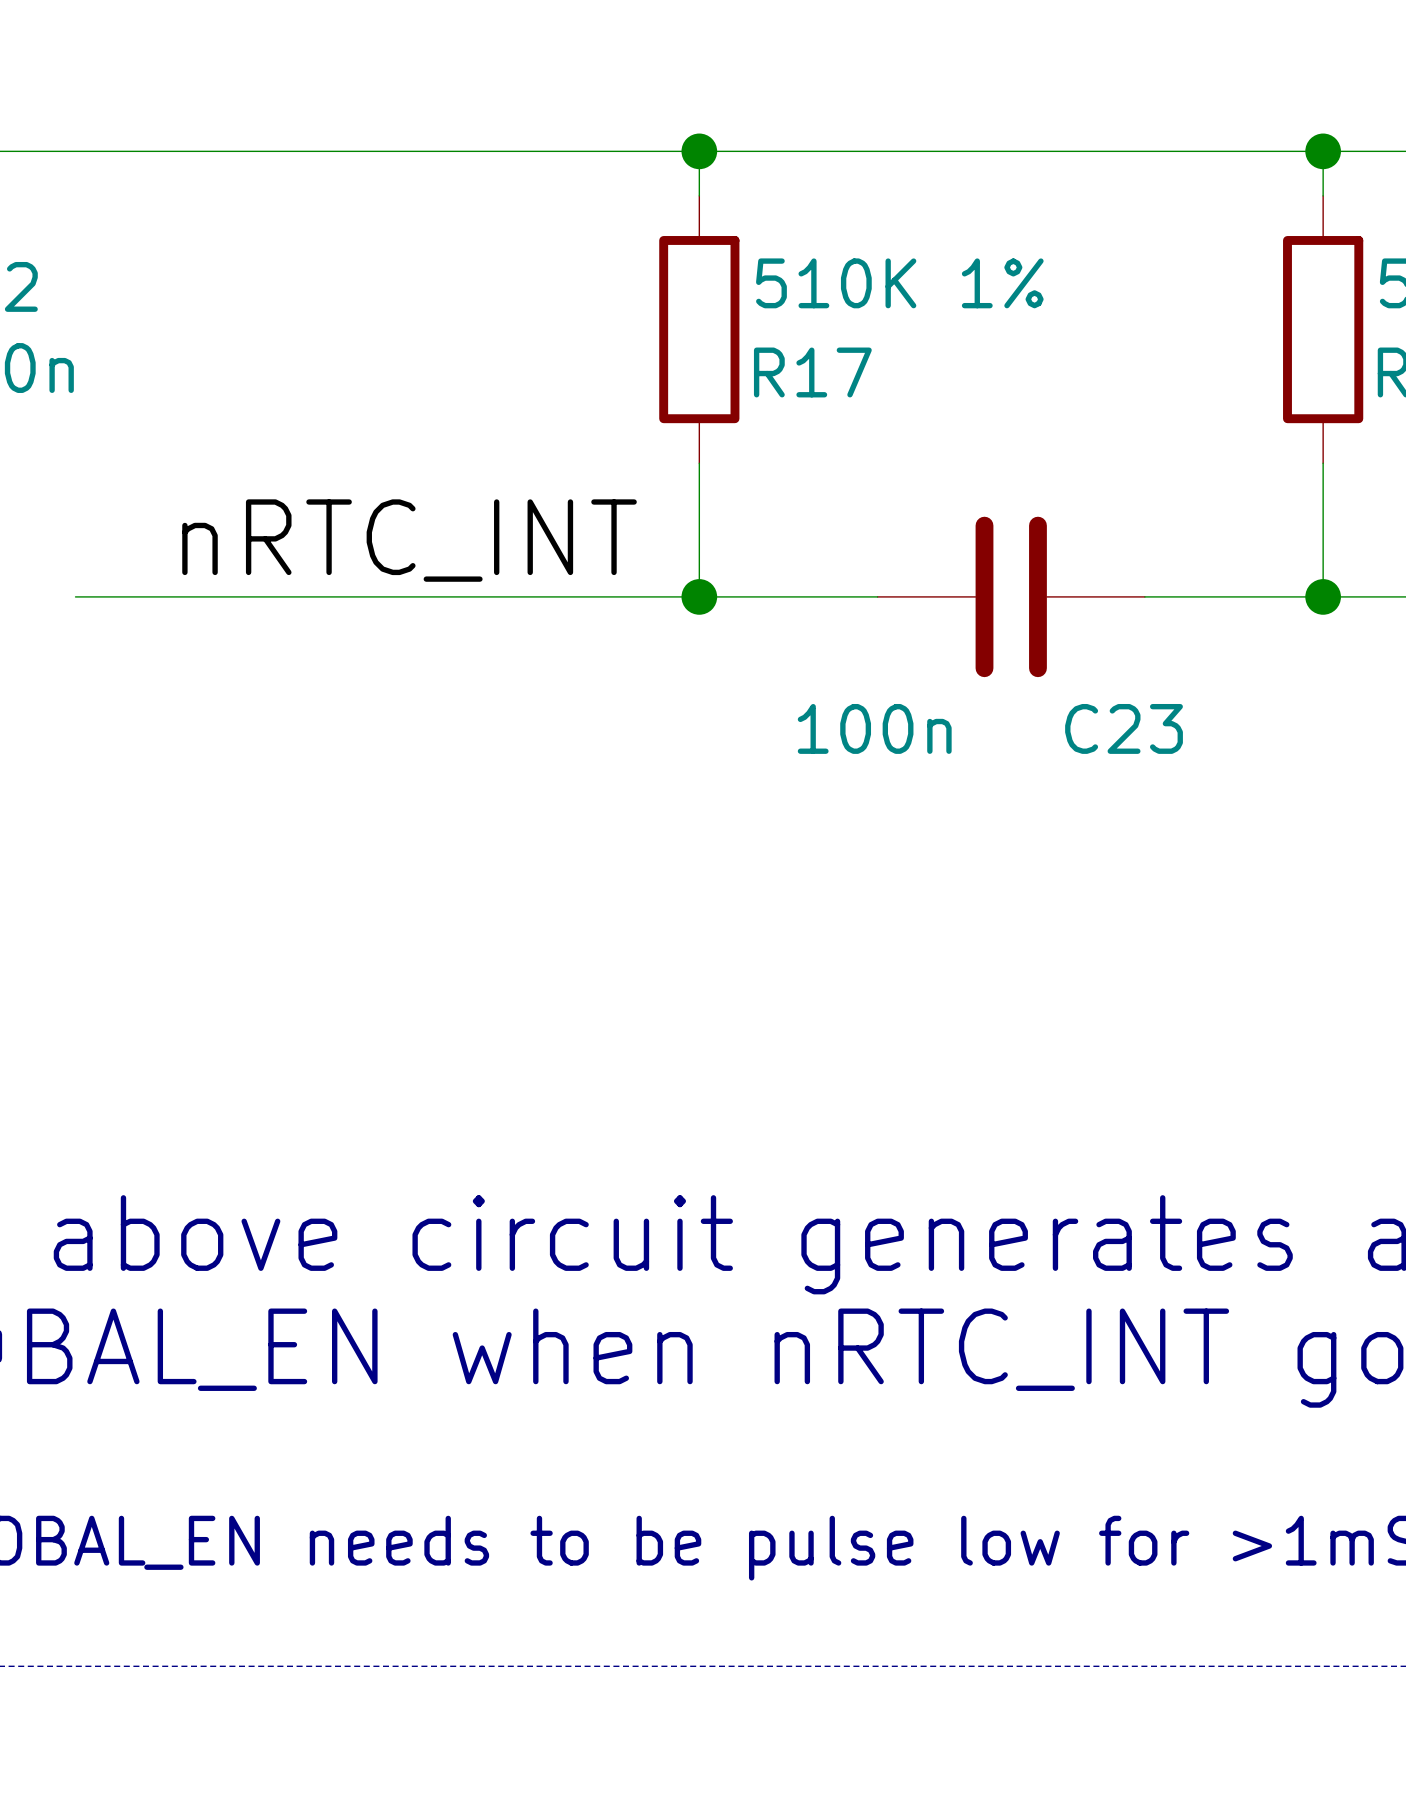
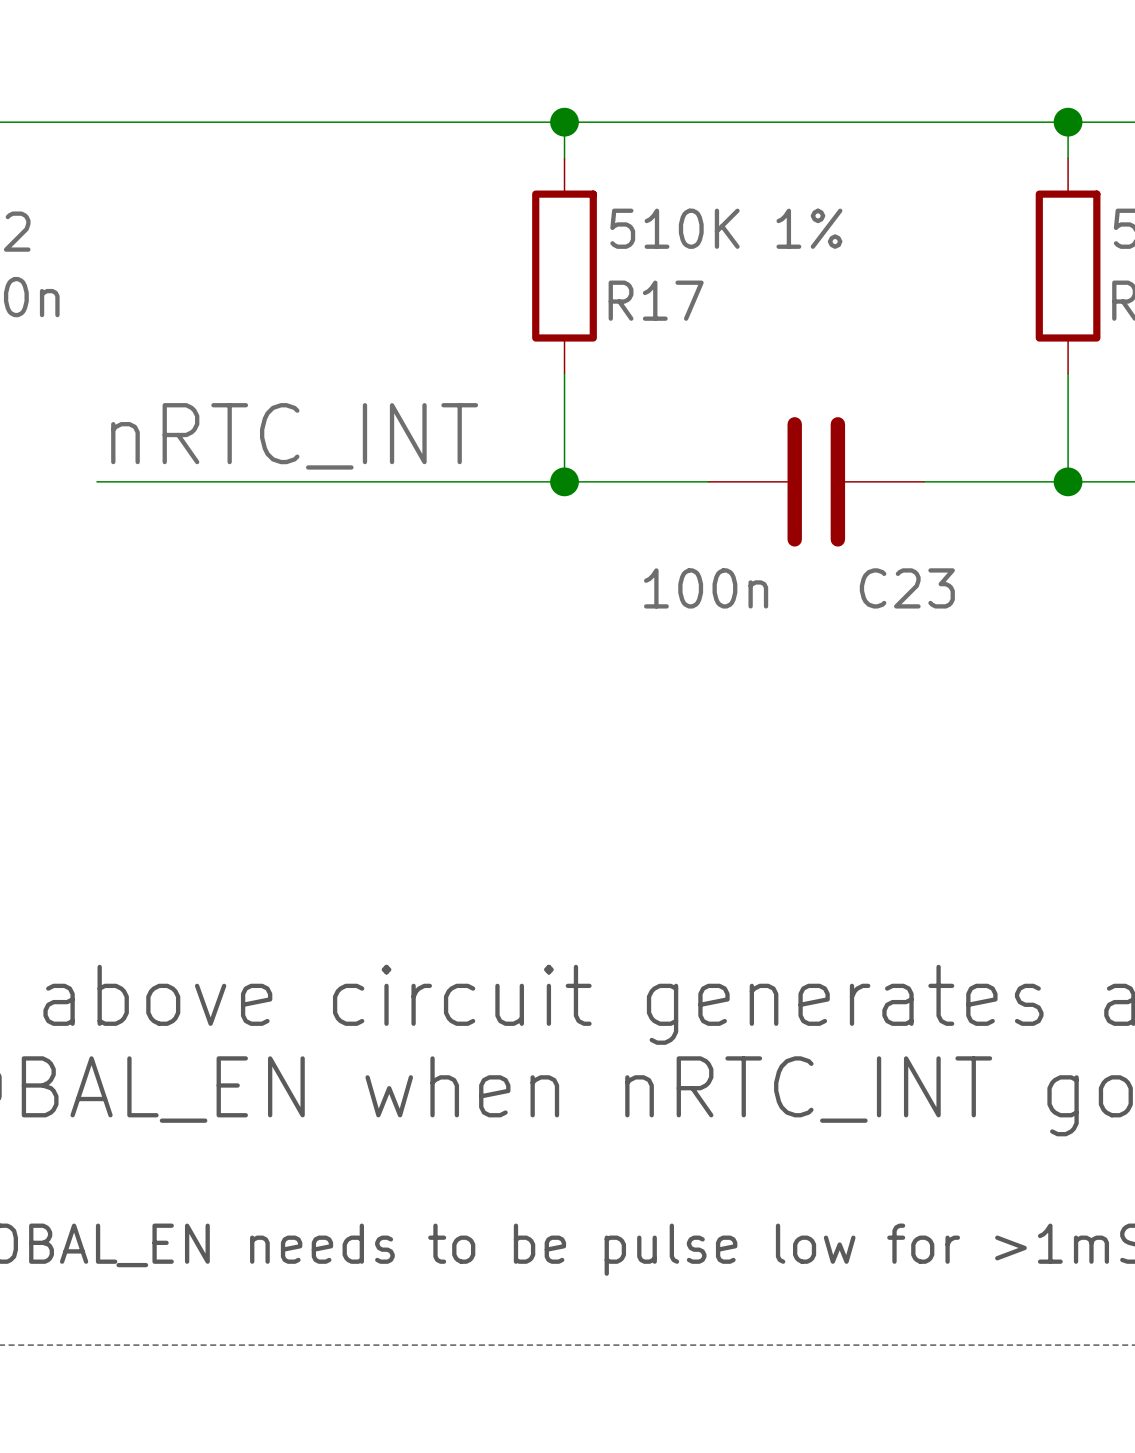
label position: nRTC_INT (409, 540) -> nRTC_INT (294, 436)
wire: (75, 596) (120, 596) -> none

